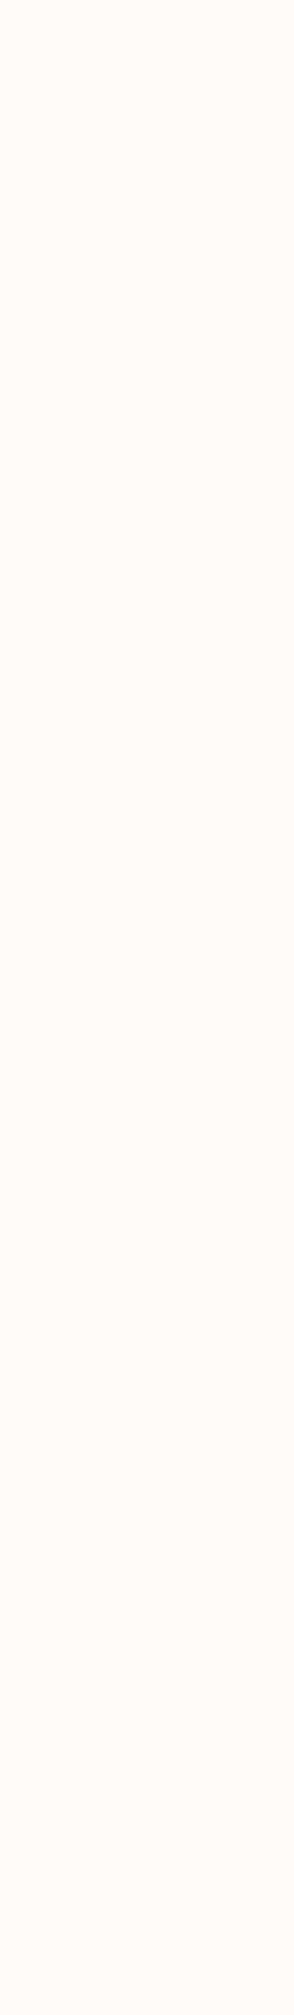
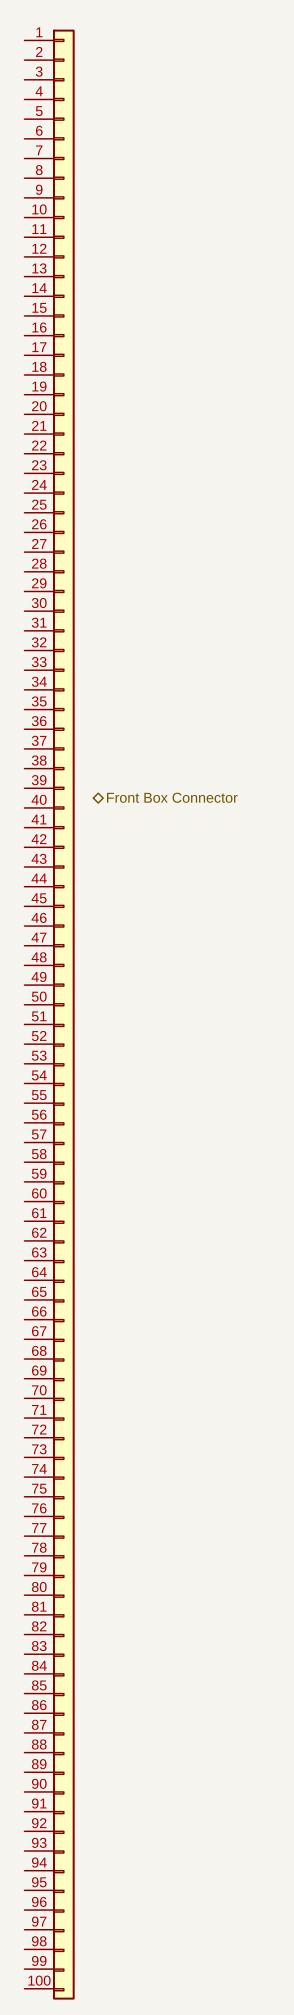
hierarchical label: none -> Front Box Connector (172, 797)
part: none -> (49, 1014)

